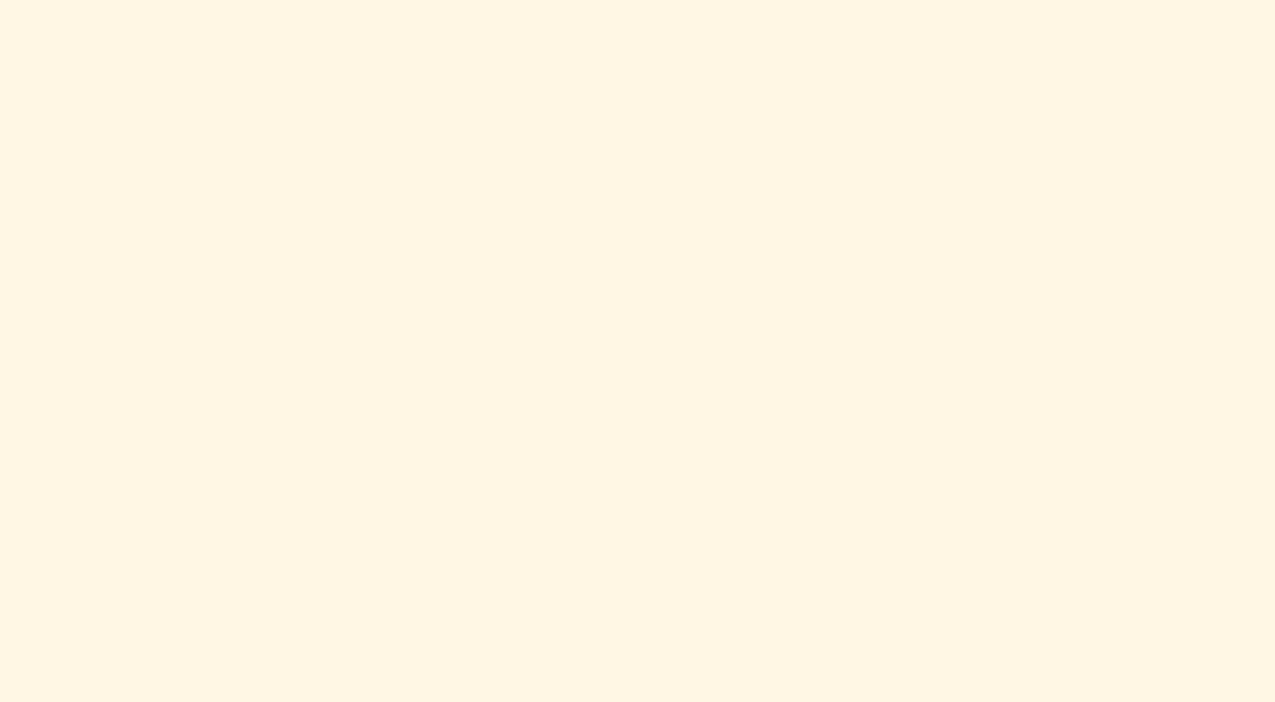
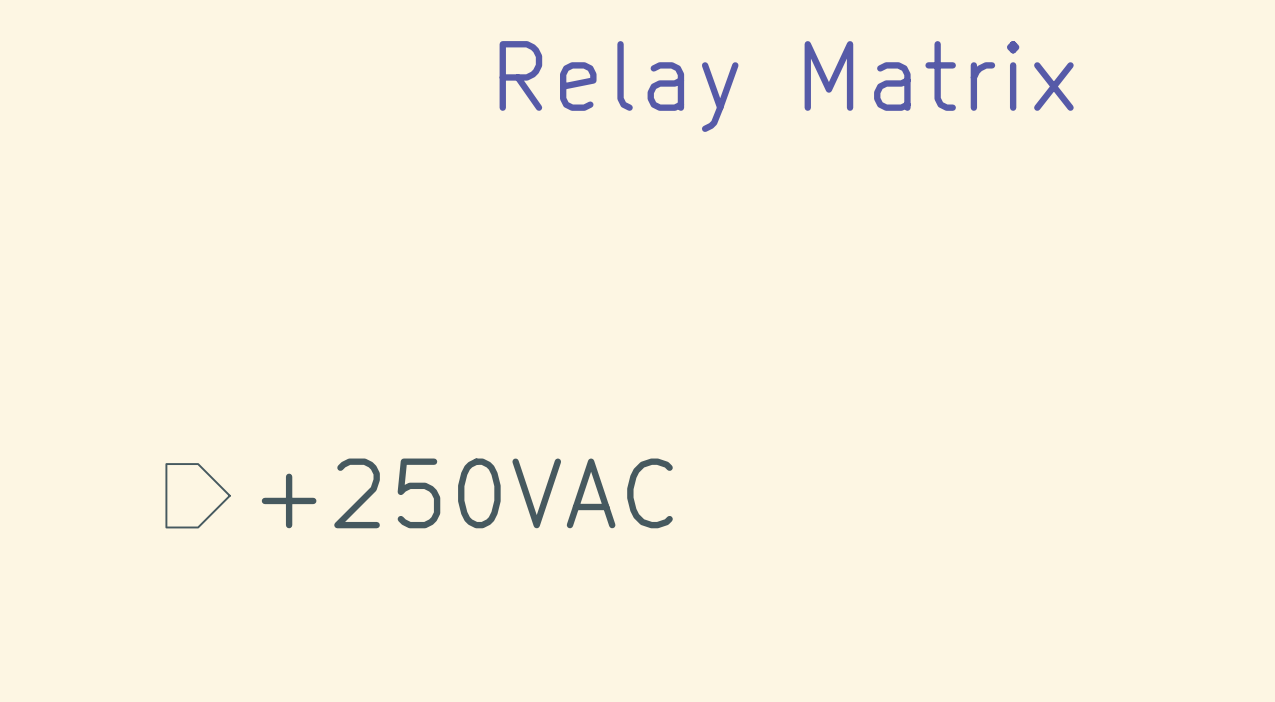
text: none -> Relay Matrix (786, 86)
sheet pin: none -> +250VAC (467, 493)

